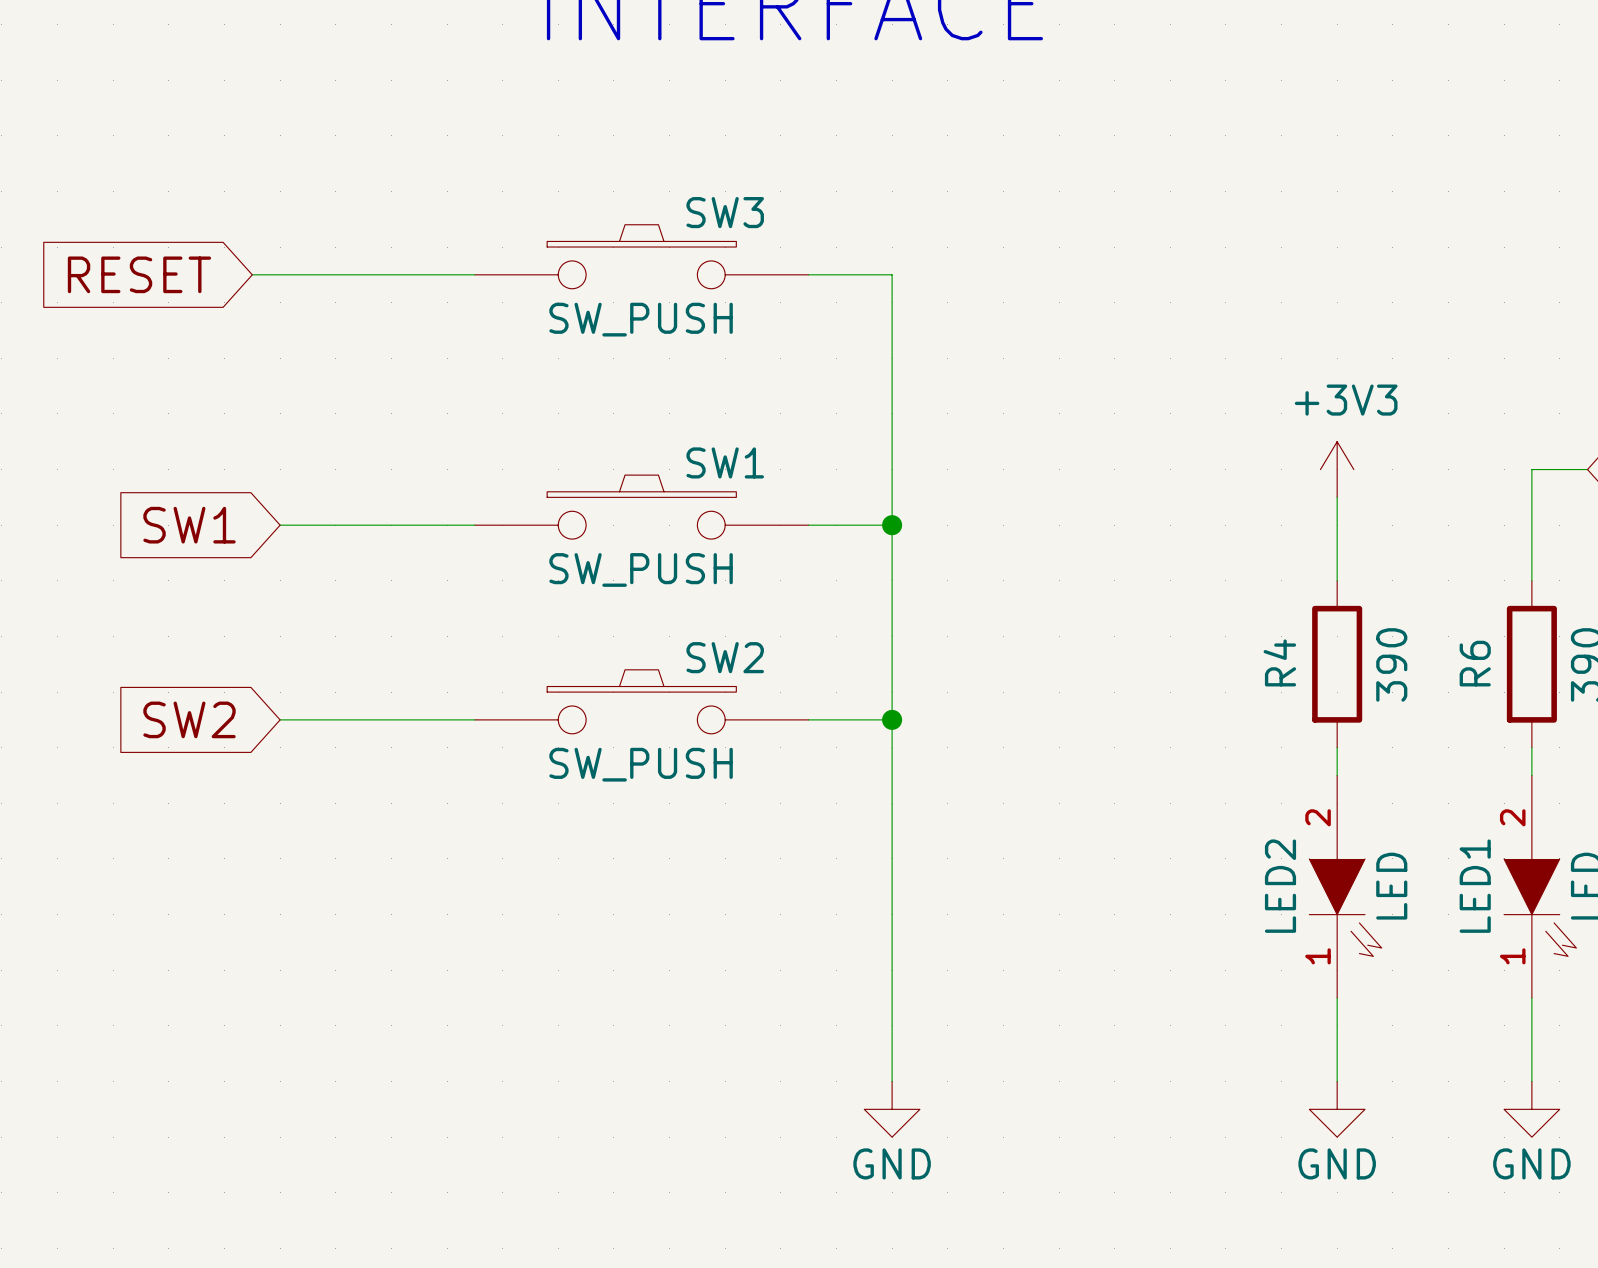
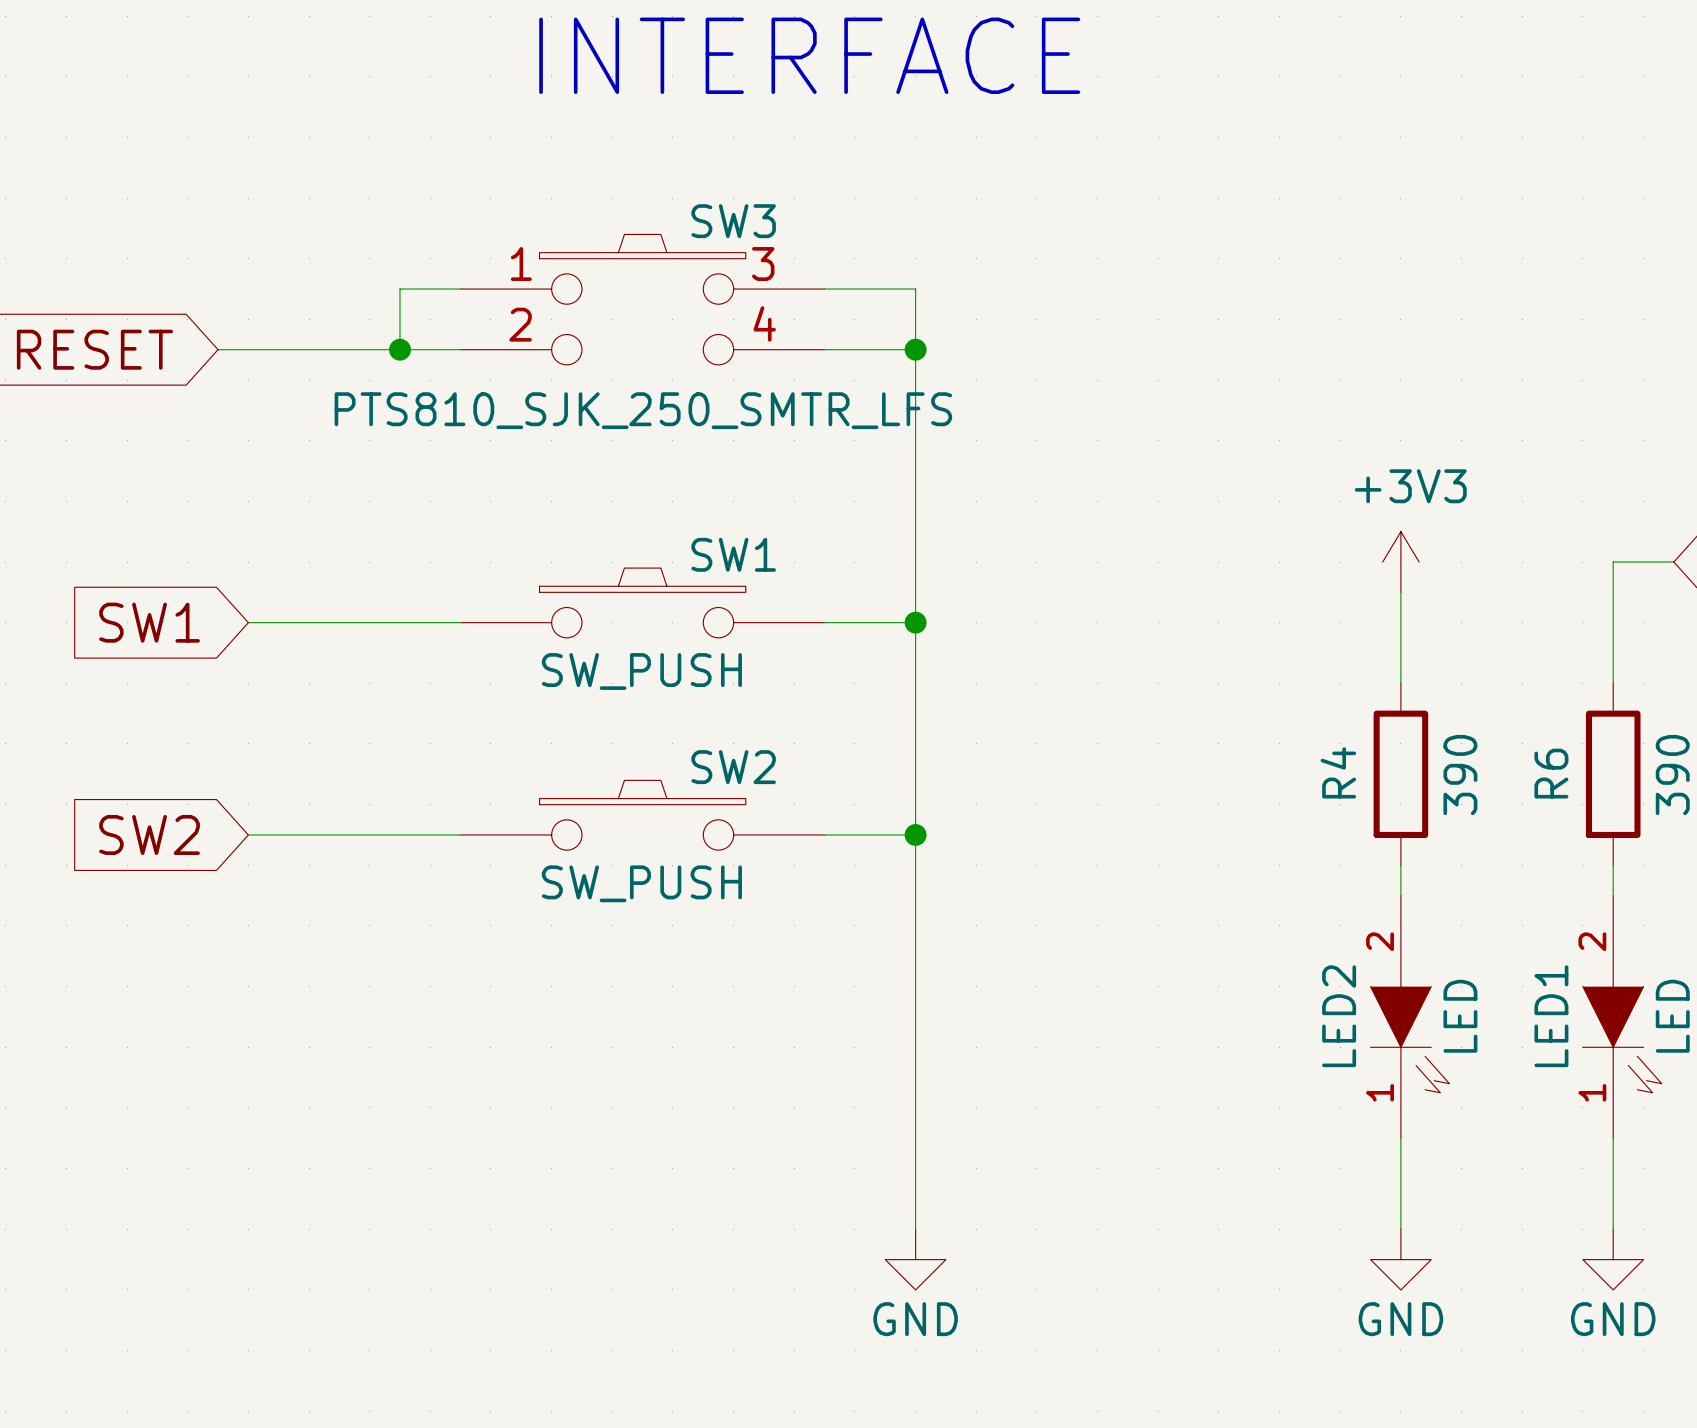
wire: none -> (460, 289) (400, 289) (400, 349)
wire: none -> (824, 289) (915, 289) (915, 349)
SW3 symbol: [474, 224, 809, 289] -> [460, 234, 825, 365]
junction: none -> (400, 349)
junction: none -> (915, 349)
SW3 value: SW_PUSH (641, 319) -> PTS810_SJK_250_SMTR_LFS (643, 410)

